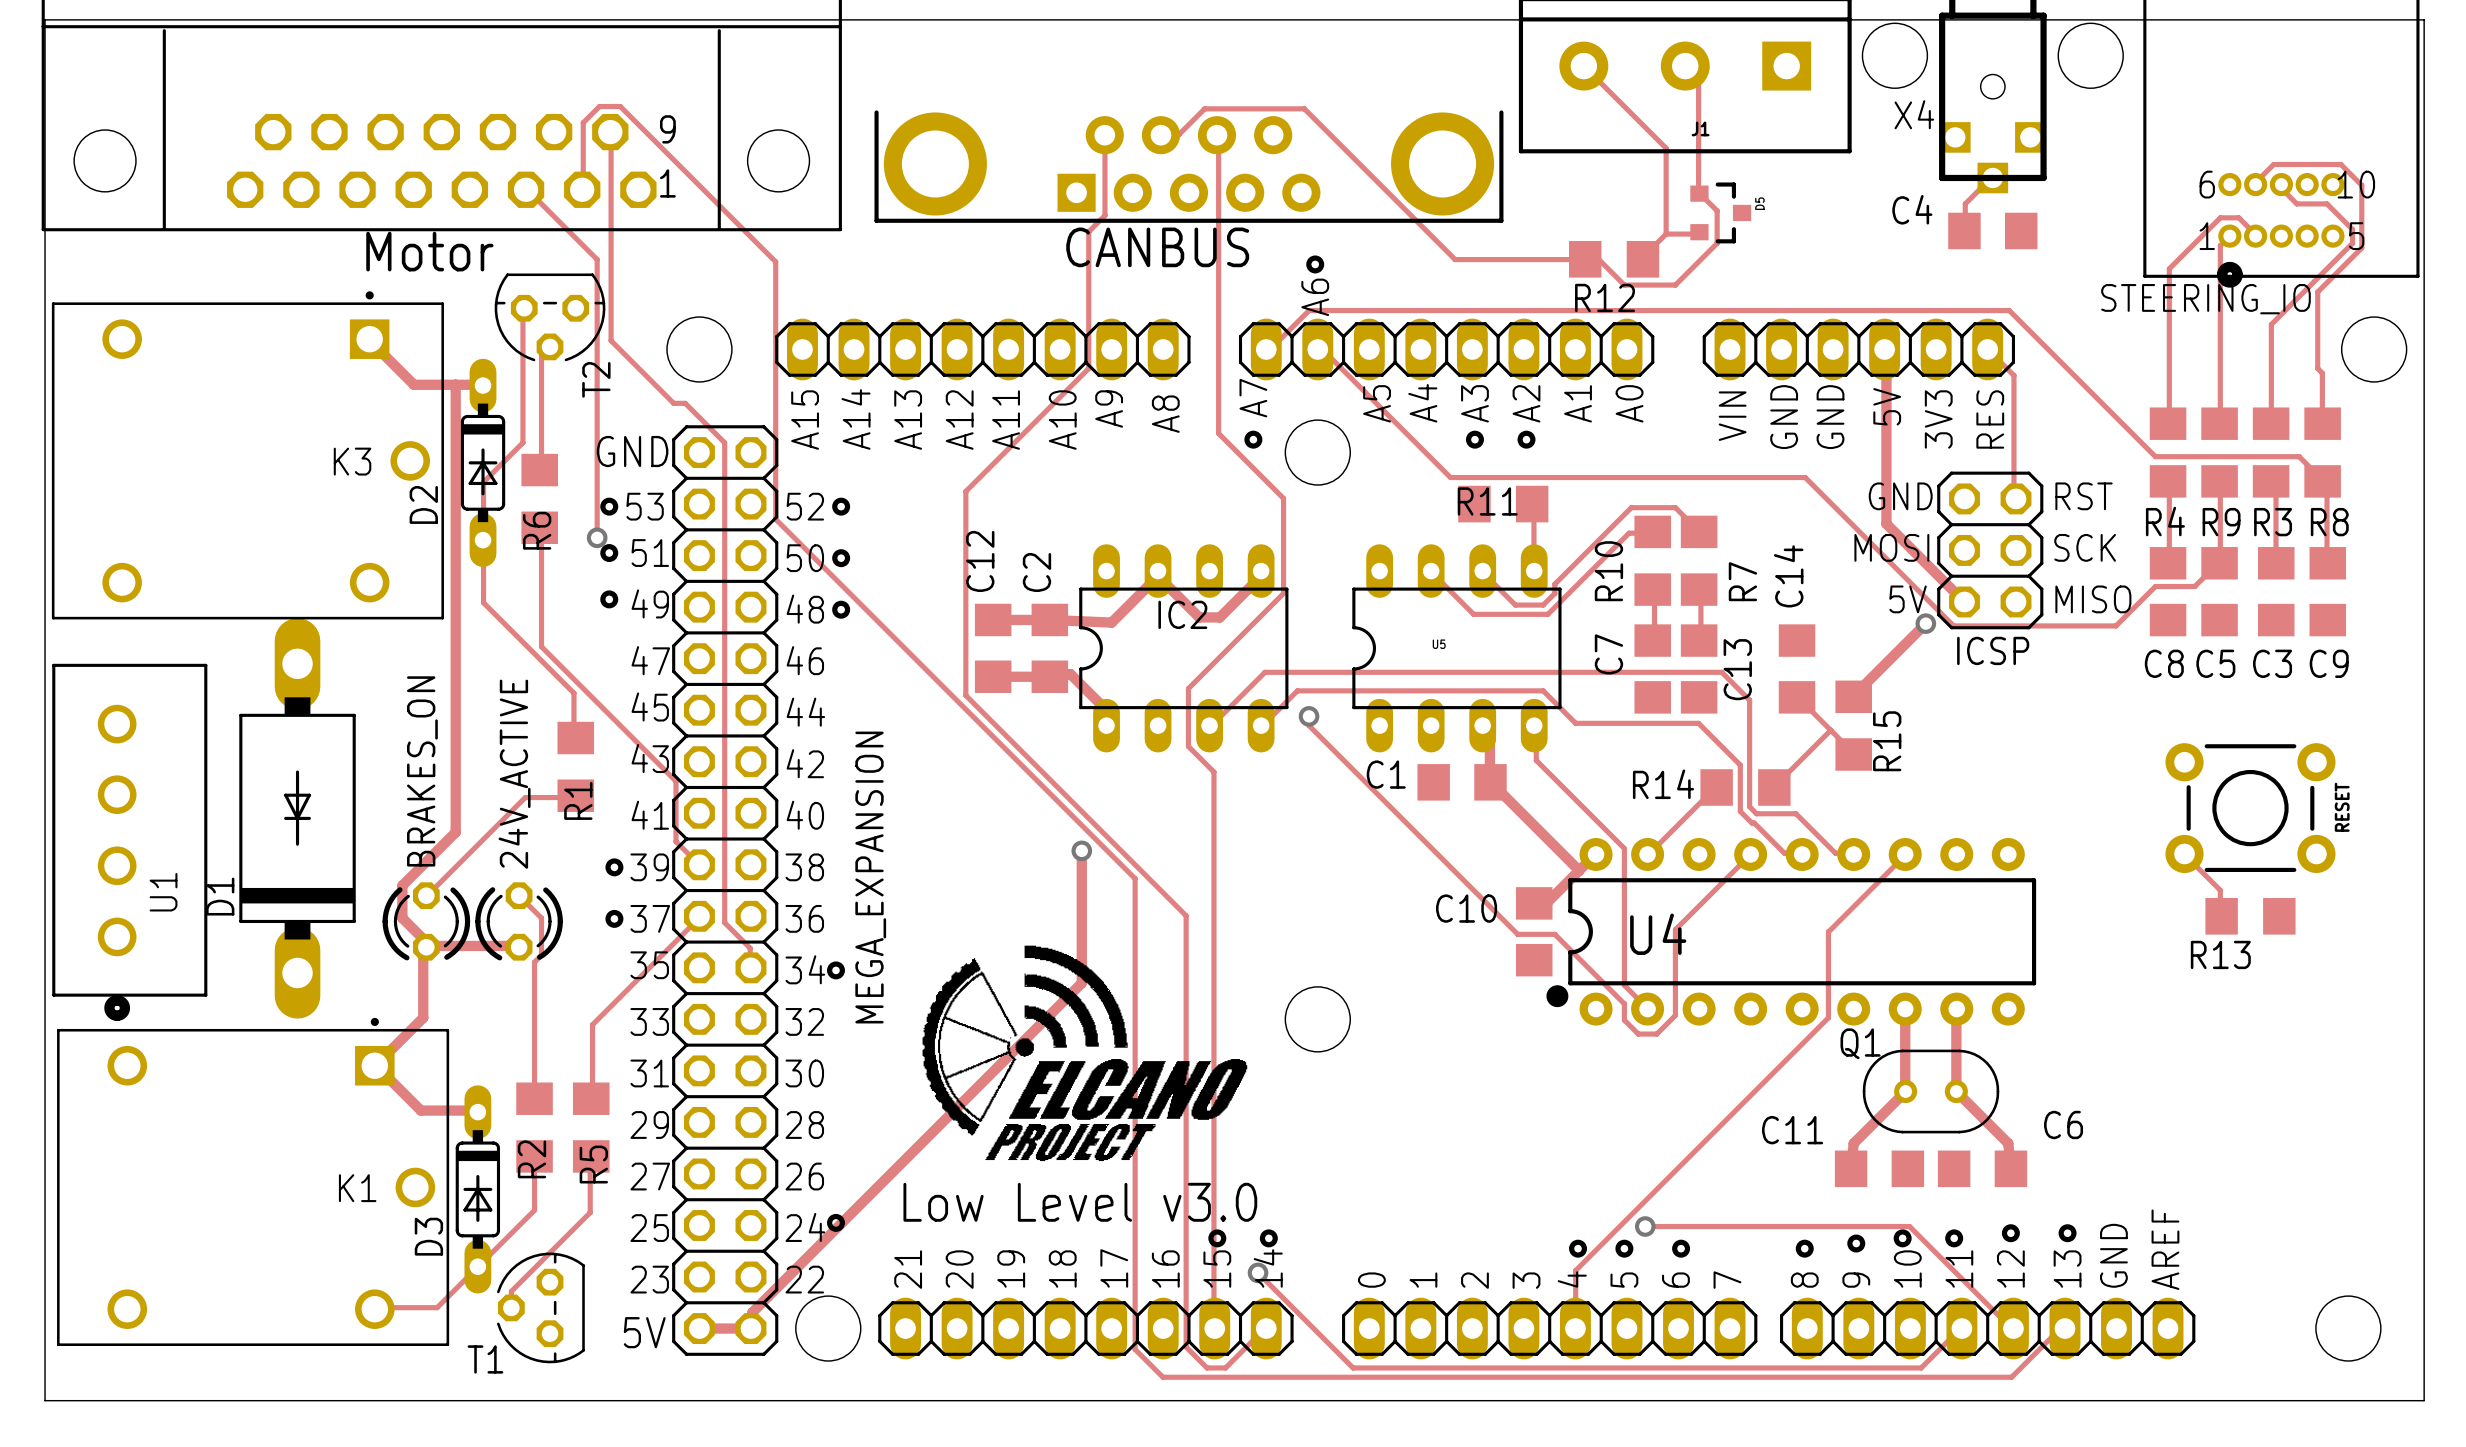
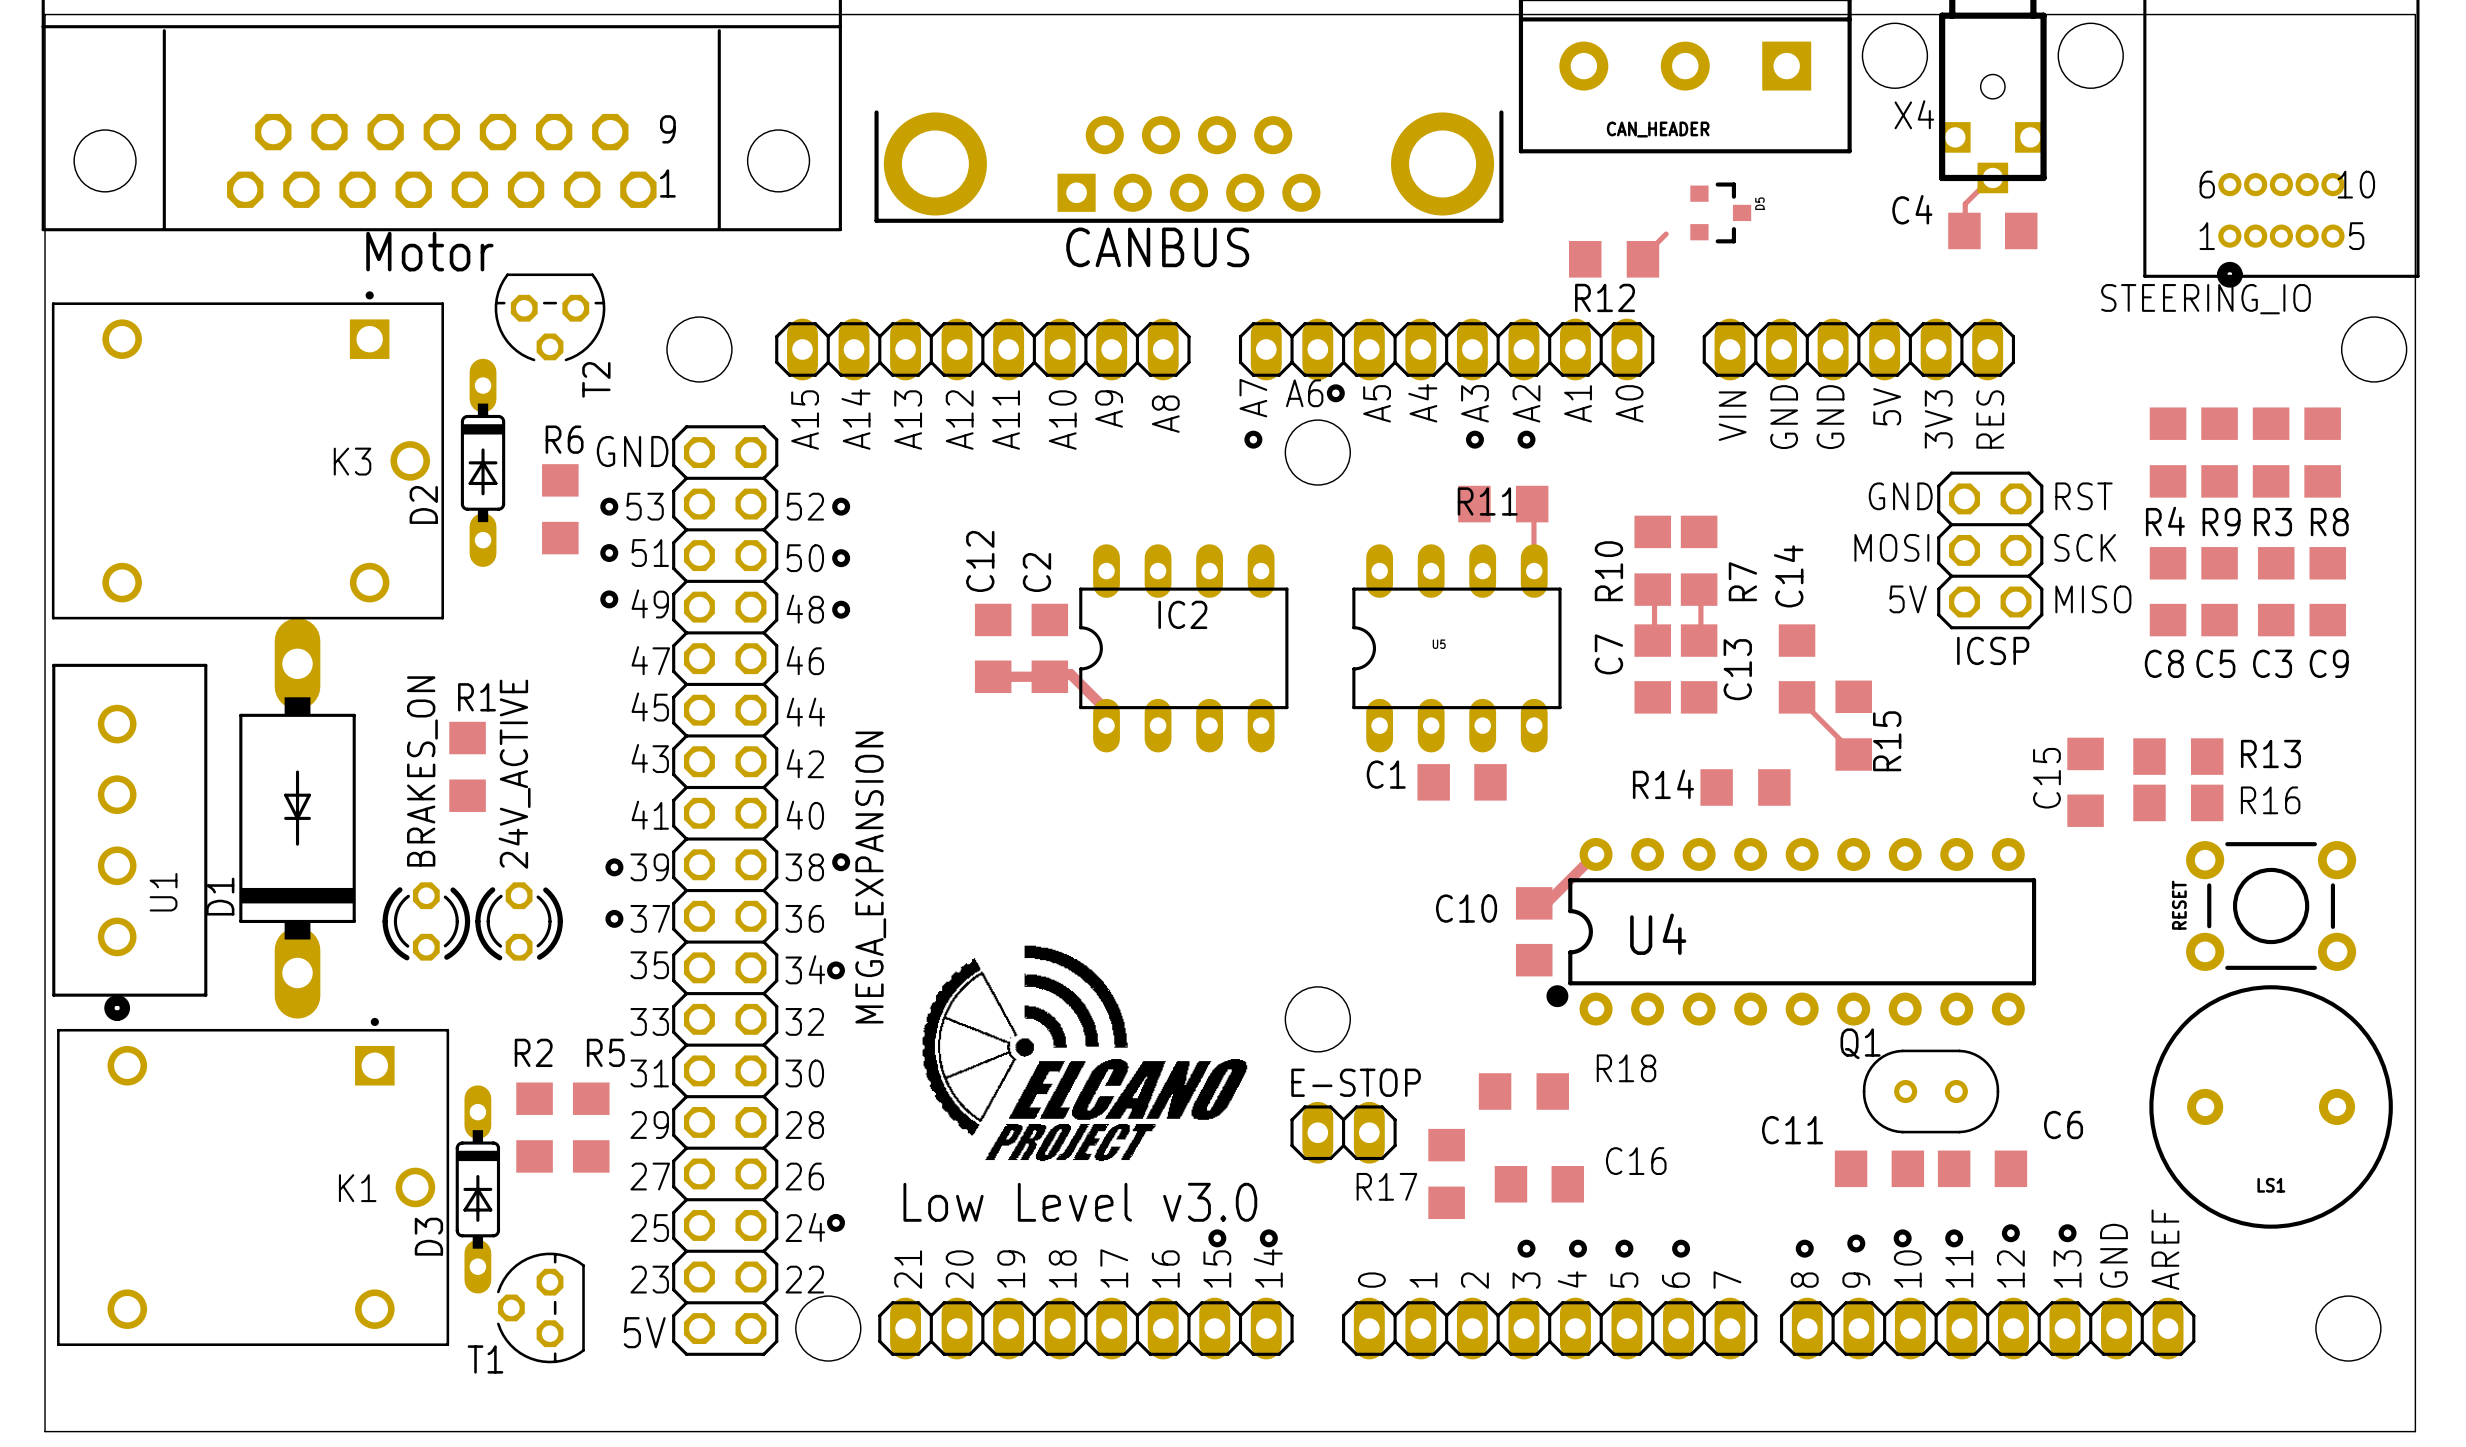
board edge: (45, 19) (2424, 19) (2424, 1400) (45, 1400) -> (45, 19) (45, 14) (2415, 14) (2415, 1431) (45, 1431) (45, 1400)
track: (1583, 66) (1666, 148) (1666, 234) (1698, 234) (1699, 232) -> none
track: (1685, 66) (1698, 78) (1698, 192) (1717, 210) (1717, 243) (1675, 285) (1624, 285) (1598, 259) (1455, 259) (1304, 108) (1204, 108) (1179, 134) (1160, 135) -> none
J1 name: J1 (1700, 128) -> CAN_HEADER (1658, 129)
track: (610, 132) (611, 340) (673, 403) (685, 403) (724, 442) (724, 922) (750, 948) (750, 967) -> none
track: (1104, 135) (1104, 215) (1088, 231) (1088, 368) (965, 491) (965, 695) (1186, 915) (1186, 1347) (1207, 1367) (1225, 1367) (1266, 1328) -> none
track: (1216, 135) (1218, 136) (1218, 433) (1283, 498) (1283, 593) (1188, 688) (1188, 746) (1213, 772) (1214, 1328) -> none
track: (2255, 184) (2273, 164) (2340, 164) (2361, 185) (2361, 247) (2317, 292) (2317, 368) (2322, 373) (2322, 423) -> none
track: (2281, 184) (2282, 190) (2296, 203) (2327, 203) (2352, 229) (2352, 243) (2271, 324) (2271, 423) -> none
track: (526, 189) (597, 259) (597, 537) -> none
track: (582, 189) (583, 122) (599, 106) (620, 106) (775, 261) (775, 519) (1135, 878) (1135, 1349) (1162, 1377) (2011, 1377) (2060, 1328) (2064, 1328) -> none
track: (2229, 236) (2220, 245) (2219, 423) -> none
track: (2255, 236) (2238, 217) (2220, 217) (2169, 268) (2168, 423) -> none
drawing position: (1315, 264) -> (1335, 393)
text rotation: 0° (1315, 297) -> 90° clockwise (1304, 393)
text position: A6 (1315, 297) -> A6 (1304, 393)
track: (524, 308) (522, 442) (483, 482) (483, 602) (573, 693) (573, 737) (575, 738) -> none
track: (369, 339) (413, 384) (483, 385) -> none
track: (550, 346) (541, 354) (541, 468) (539, 470) -> none
track: (1266, 349) (1271, 347) (1309, 310) (2009, 310) (2155, 456) (2299, 456) (2327, 484) (2327, 563) -> none
track: (1317, 349) (1322, 350) (1450, 477) (1805, 477) (1953, 625) (2115, 625) (2155, 586) (2194, 586) (2220, 561) (2219, 481) -> none
track: (1884, 349) (1886, 350) (1886, 523) (1964, 601) -> none
track: (1987, 349) (2013, 375) (2013, 498) (2016, 498) -> none
track: (455, 384) (455, 832) (402, 885) (402, 918) (425, 941) (426, 947) -> none
track: (2168, 481) (2168, 563) -> none
track: (2271, 481) (2275, 486) (2276, 563) -> none
R6 position: (539, 498) -> (560, 509)
track: (539, 527) (541, 528) (541, 646) (676, 781) (676, 841) (699, 864) -> none
R6 name rotation: 0° (537, 530) -> 90° clockwise (564, 439)
R6 name position: R6 (537, 530) -> R6 (564, 439)
track: (1652, 531) (1629, 533) (1547, 614) (1473, 614) (1431, 571) -> none
track: (1699, 531) (1675, 507) (1631, 507) (1554, 584) (1554, 593) (1543, 605) (1515, 605) (1482, 571) -> none
via: (597, 537) -> none
track: (1261, 571) (1261, 576) (1219, 617) (1199, 617) (1158, 576) -> none
track: (1158, 576) (1111, 622) (993, 619) -> none
track: (1925, 623) (1853, 696) -> none
via: (1925, 623) -> none
track: (1309, 716) (1309, 725) (1517, 934) (1554, 934) (1624, 1003) (1624, 1020) (1638, 1034) (1656, 1034) (1675, 1015) (1675, 929) (1750, 854) -> none
via: (1309, 716) -> none
track: (1209, 725) (1264, 672) (1721, 672) (1749, 700) (1749, 806) (1756, 813) (1795, 813) (1835, 853) (1853, 854) -> none
track: (1261, 725) (1297, 690) (1543, 690) (1575, 723) (1698, 723) (1740, 765) (1740, 811) (1784, 853) (1802, 854) -> none
track: (1482, 725) (1489, 732) (1490, 782) (1579, 870) -> none
track: (1534, 725) (1536, 725) (1536, 760) (1624, 848) (1624, 985) (1647, 1009) -> none
track: (1830, 730) (1774, 787) -> none
R1 position: (575, 766) -> (467, 766)
C15: none -> (2085, 782)
track: (1716, 787) (1647, 854) -> none
track: (575, 795) (573, 797) (525, 797) (426, 895) -> none
R1 name rotation: 0° (578, 800) -> 90° clockwise (476, 697)
R1 name position: R1 (578, 800) -> R1 (476, 697)
R16: none -> (2178, 802)
RESET name position: RESET (2342, 807) -> RESET (2179, 905)
RESET position: (2250, 808) -> (2271, 906)
track: (1081, 850) (1081, 983) (752, 1312) (750, 1328) (699, 1328) -> none
via: (1081, 850) -> none
drawing: none -> [832, 853, 851, 872]
track: (2184, 853) (2220, 890) (2221, 916) -> none
track: (1905, 854) (1828, 932) (1828, 1017) (1575, 1270) (1575, 1328) -> none
track: (519, 895) (541, 918) (541, 955) (534, 962) (534, 1098) -> none
track: (699, 916) (592, 1024) (591, 1098) -> none
R13 position: (2250, 916) -> (2178, 756)
track: (426, 947) (519, 947) -> none
track: (426, 947) (423, 950) (423, 1017) (374, 1065) (420, 1110) (476, 1110) (477, 1112) -> none
R13 name position: R13 (2220, 954) -> R13 (2270, 753)
track: (1905, 1009) (1905, 1091) (1853, 1143) (1851, 1168) -> none
track: (1956, 1009) (1956, 1091) (2008, 1143) (2010, 1168) -> none
R18: none -> (1523, 1091)
LS1: none -> (2271, 1106)
E-STOP: none -> (1343, 1132)
track: (534, 1156) (534, 1210) (437, 1307) (374, 1309) -> none
track: (591, 1156) (590, 1212) (511, 1291) (511, 1307) -> none
R2 name rotation: 0° (531, 1159) -> 90° clockwise (533, 1052)
R2 name position: R2 (531, 1159) -> R2 (533, 1052)
R5 name rotation: 0° (593, 1164) -> 90° clockwise (605, 1052)
R5 name position: R5 (593, 1164) -> R5 (605, 1052)
R17: none -> (1446, 1173)
C16: none -> (1539, 1184)
track: (1645, 1226) (1909, 1226) (2013, 1328) -> none
via: (1645, 1226) -> none
drawing: none -> [1517, 1239, 1536, 1258]
track: (1258, 1272) (1353, 1367) (1921, 1367) (1961, 1328) -> none
via: (1258, 1272) -> none

